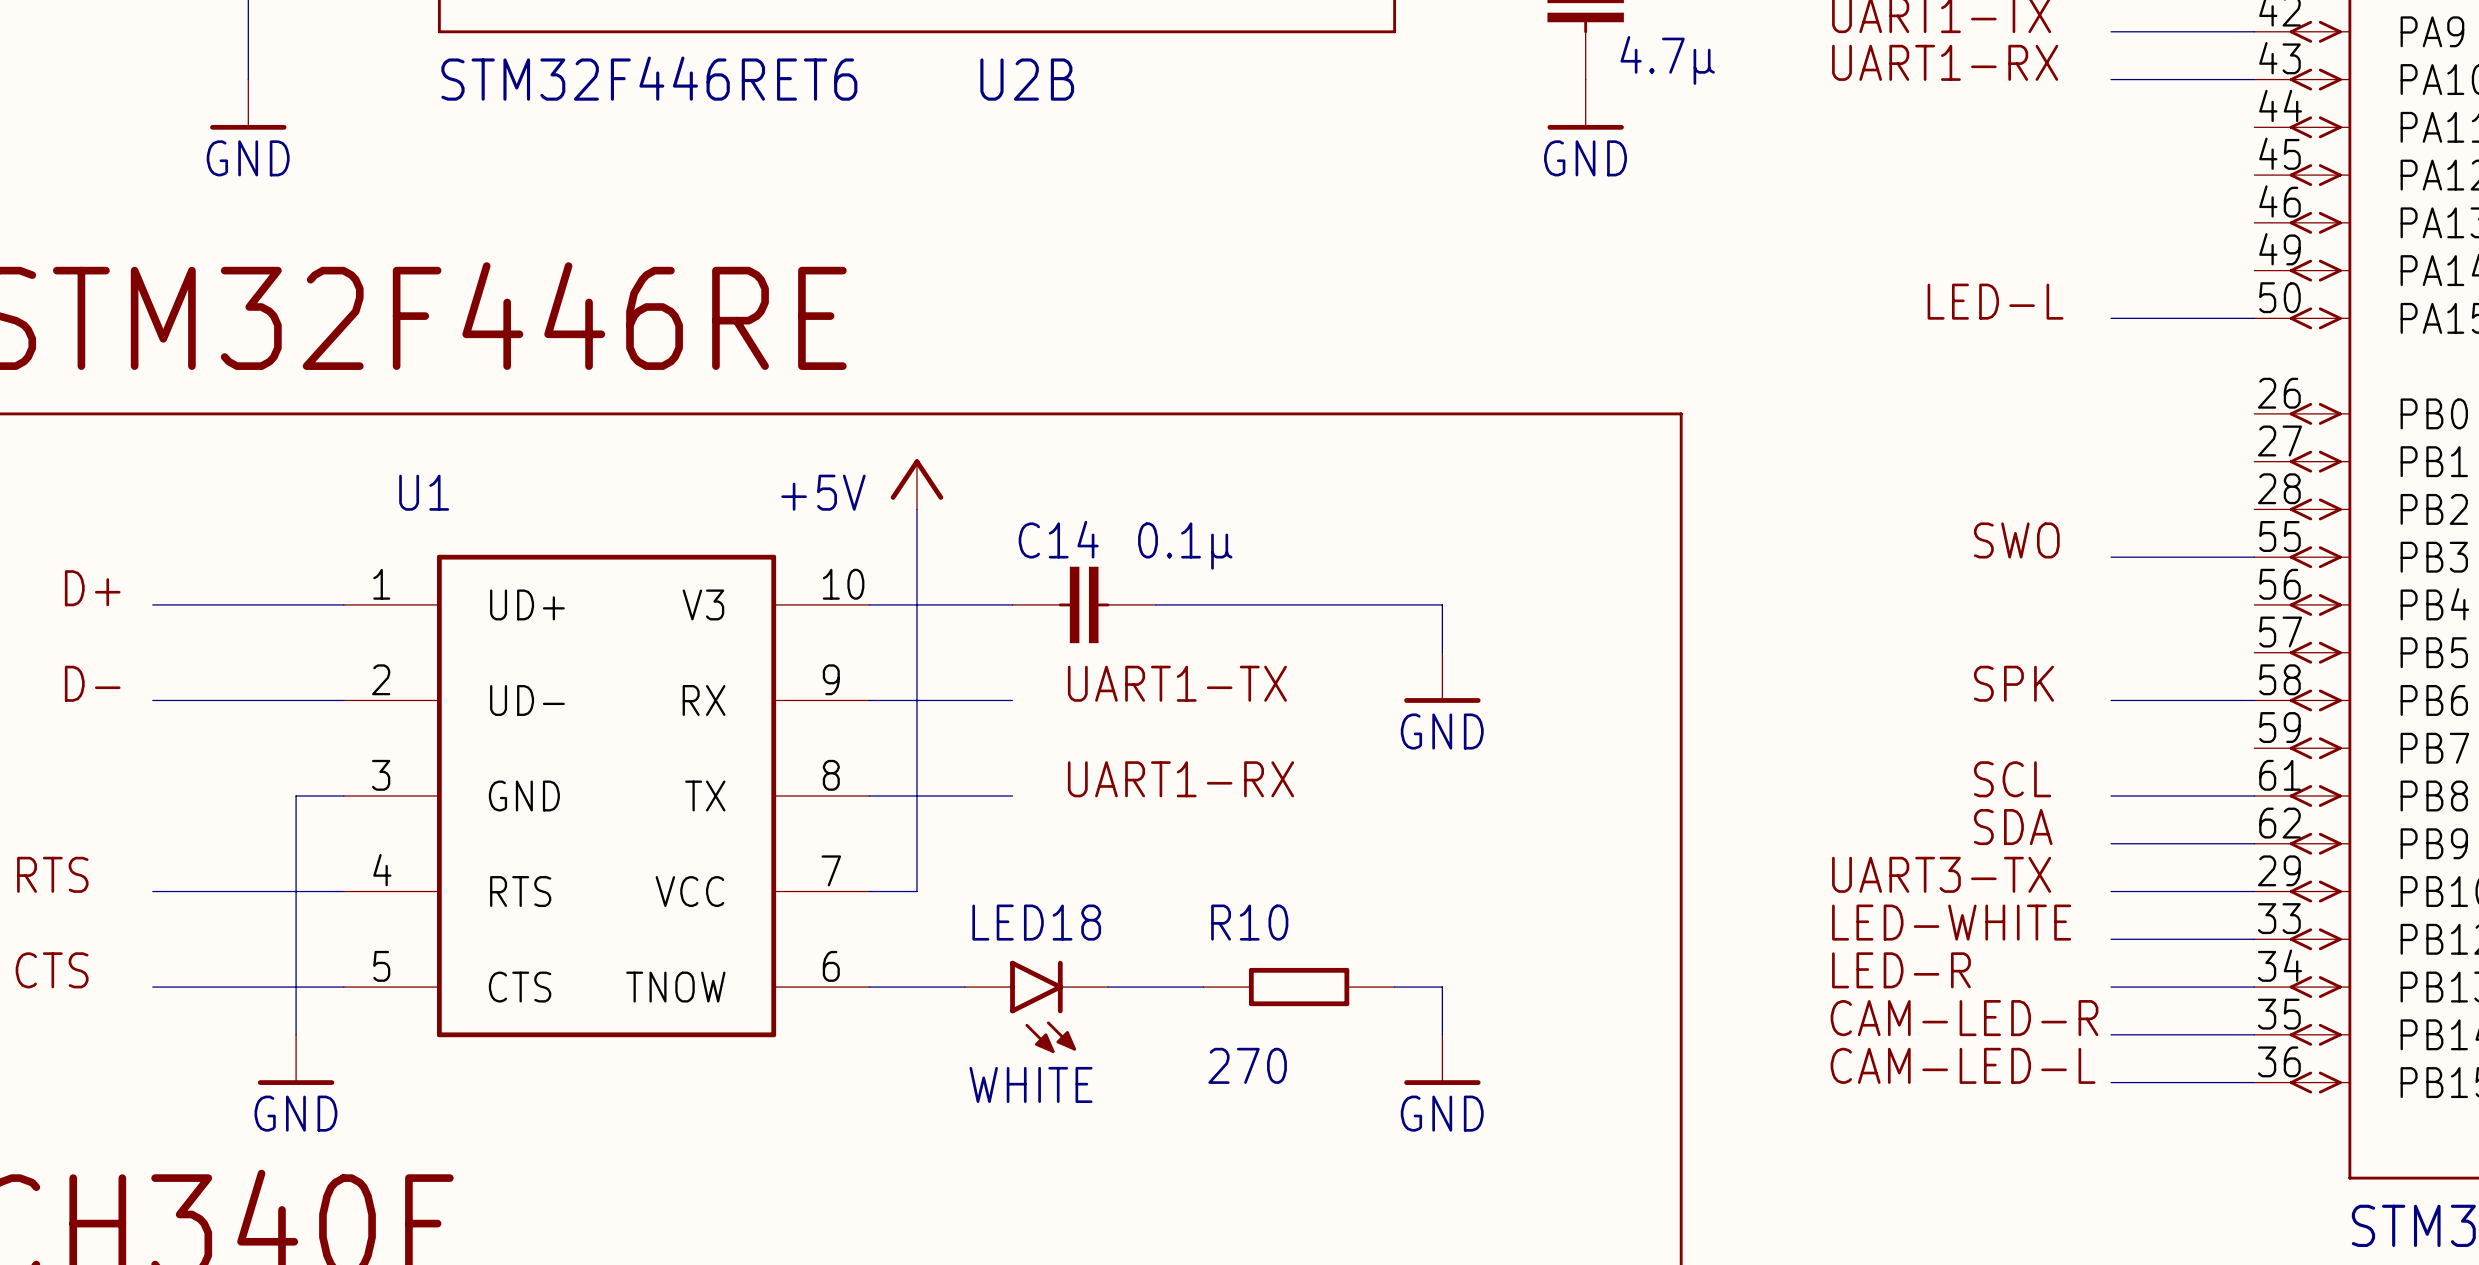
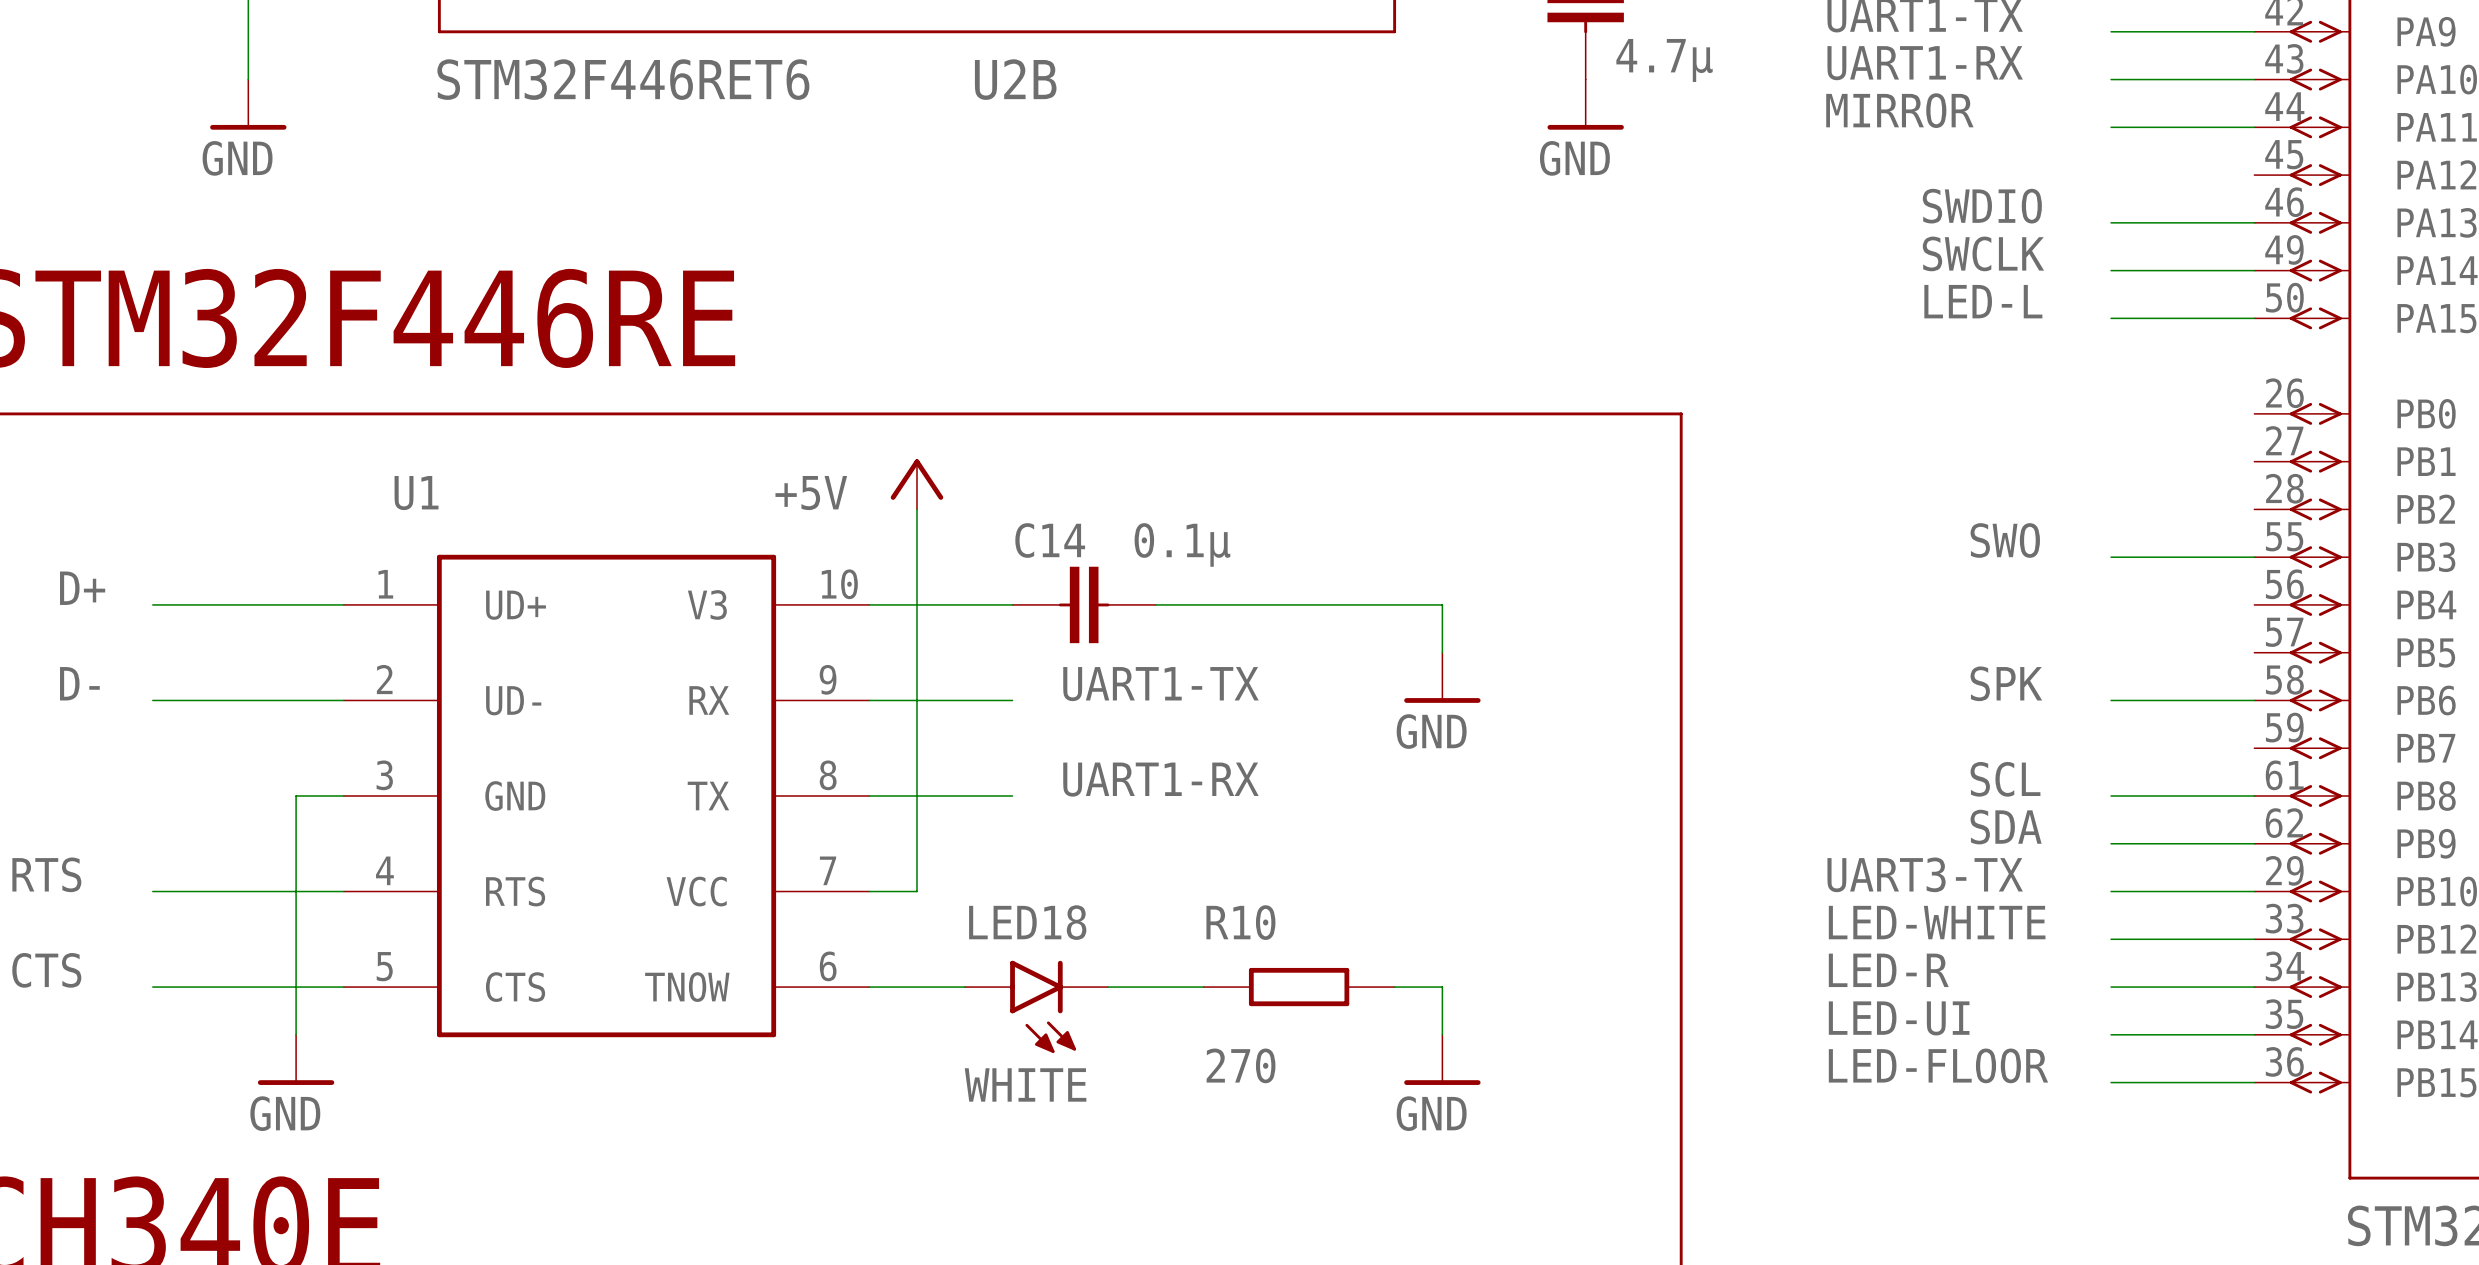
label: none -> MIRROR (1899, 110)
wire: none -> (2111, 127) (2254, 127)
label: none -> SWDIO (1982, 206)
wire: none -> (2111, 222) (2254, 222)
label: none -> SWCLK (1983, 253)
wire: none -> (2111, 270) (2254, 270)
label: CAM-LED-R (1964, 1018) -> LED-UI (1899, 1018)
label: CAM-LED-L (1963, 1065) -> LED-FLOOR (1938, 1065)

